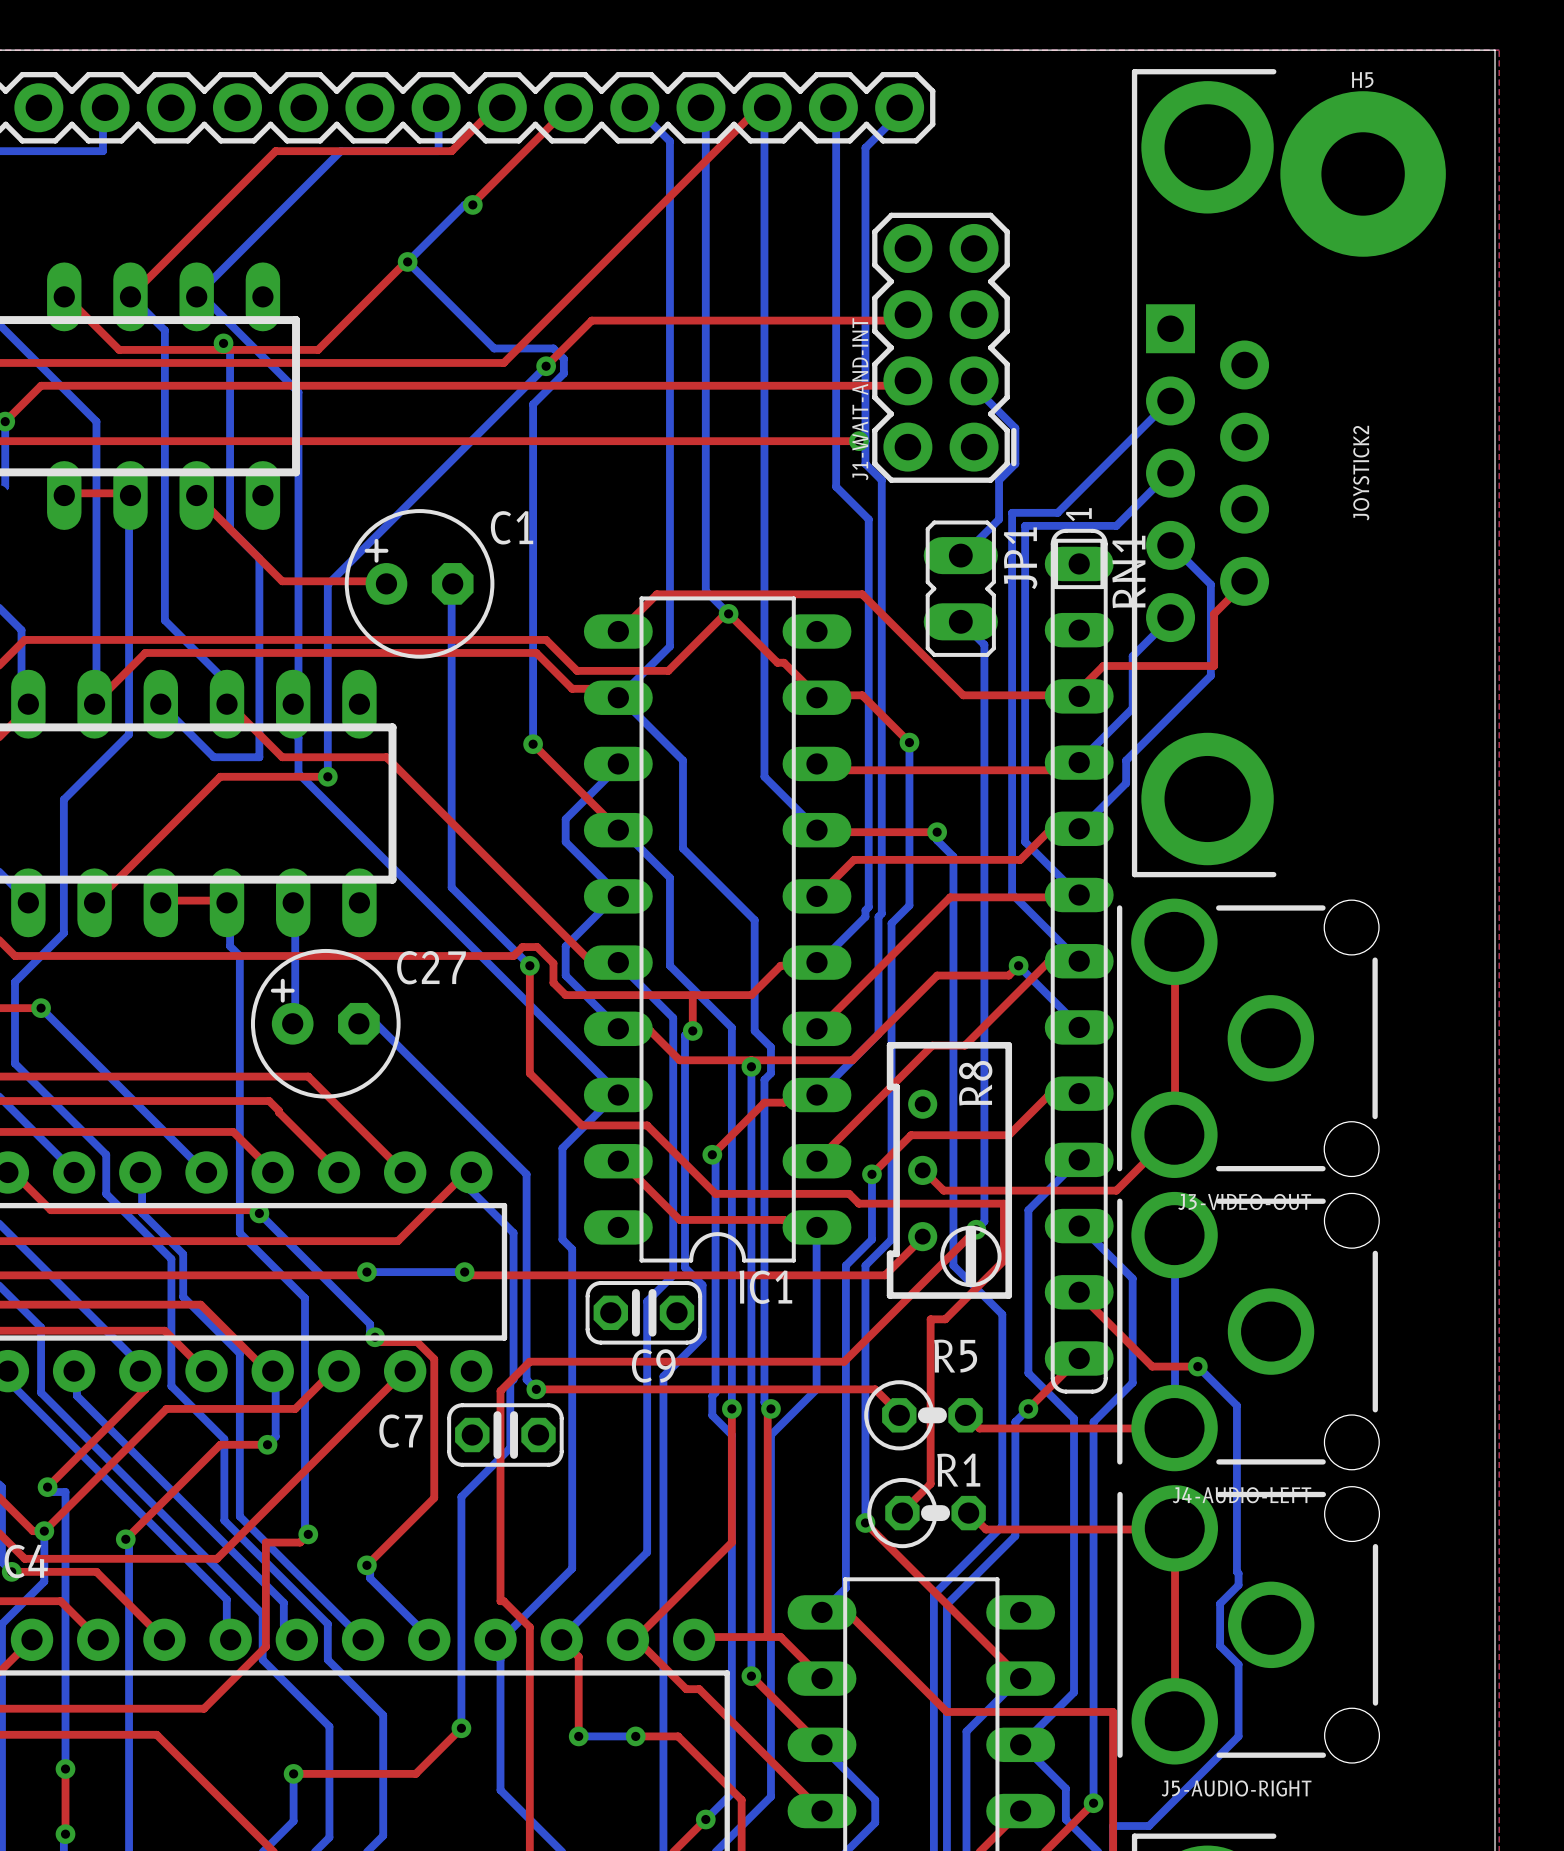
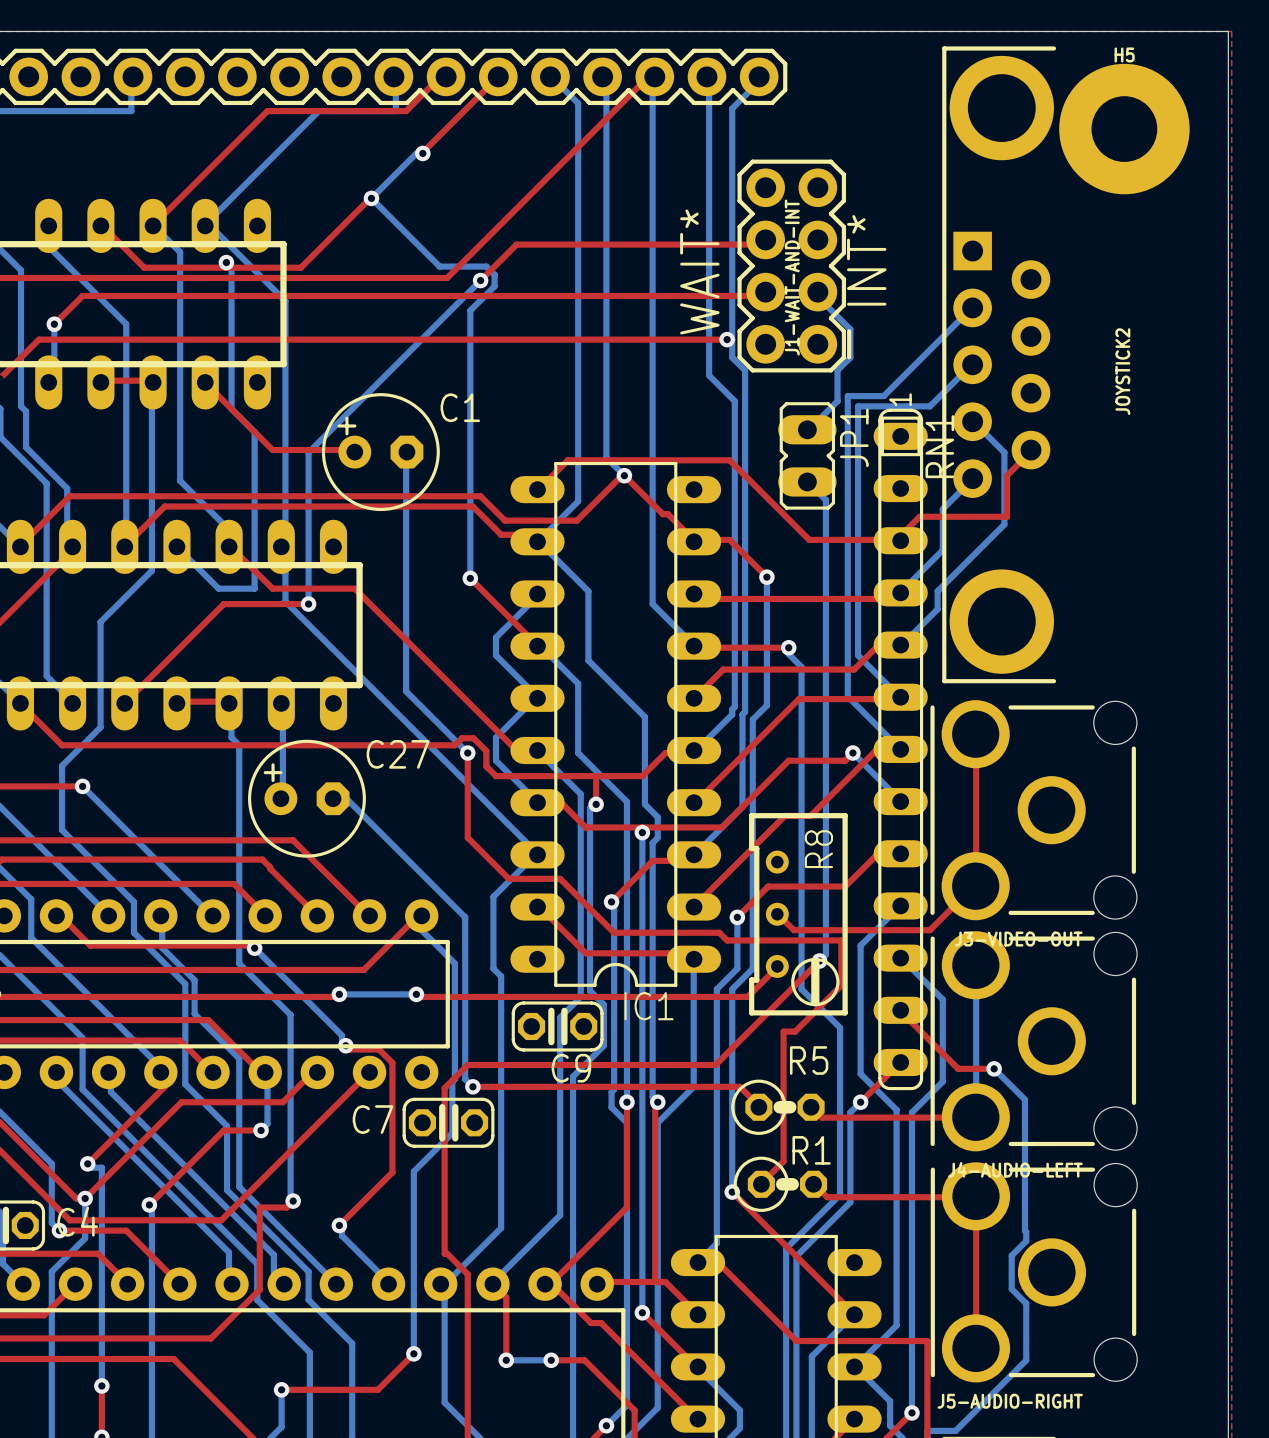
text: none -> INT* (866, 260)
text: none -> WAIT* (699, 271)
J1-WAIT-AND-INT name position: J1-WAIT-AND-INT (860, 399) -> J1-WAIT-AND-INT (792, 277)

